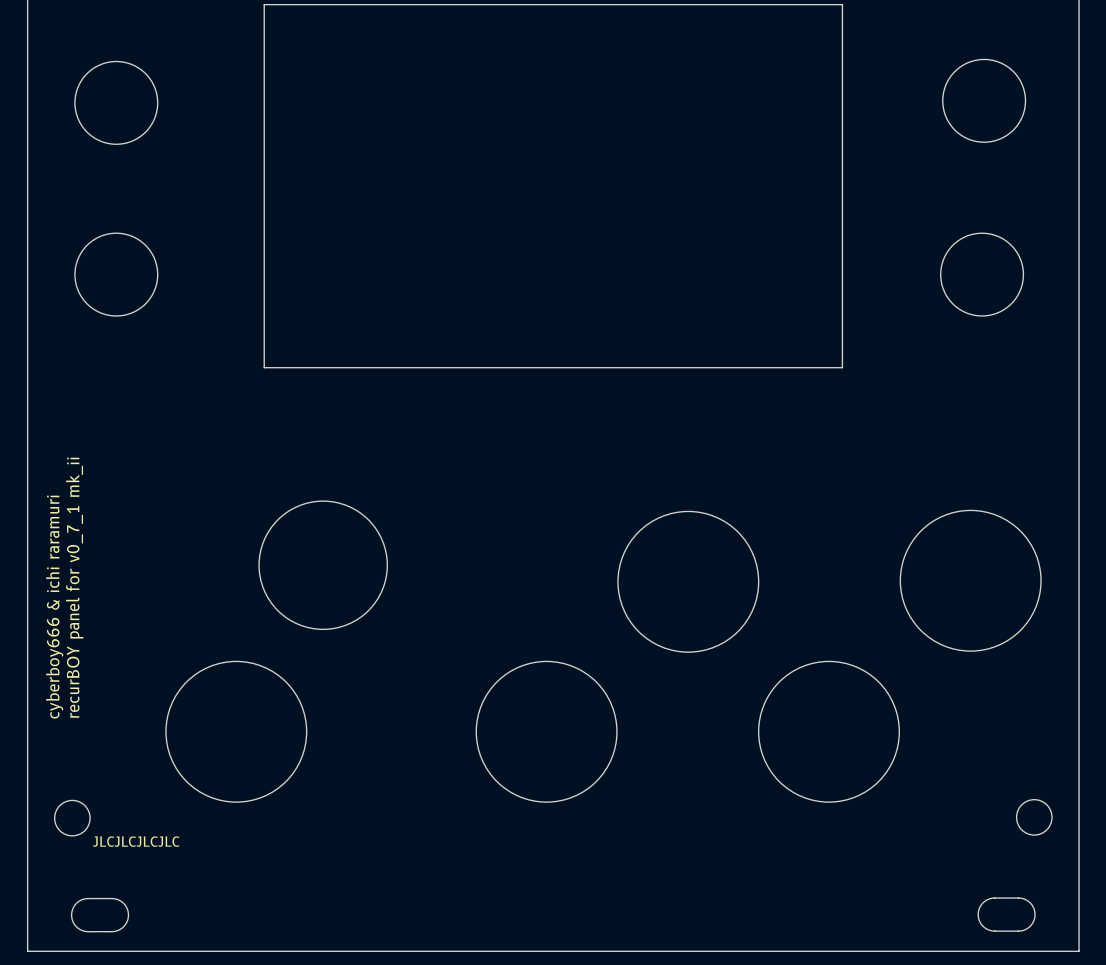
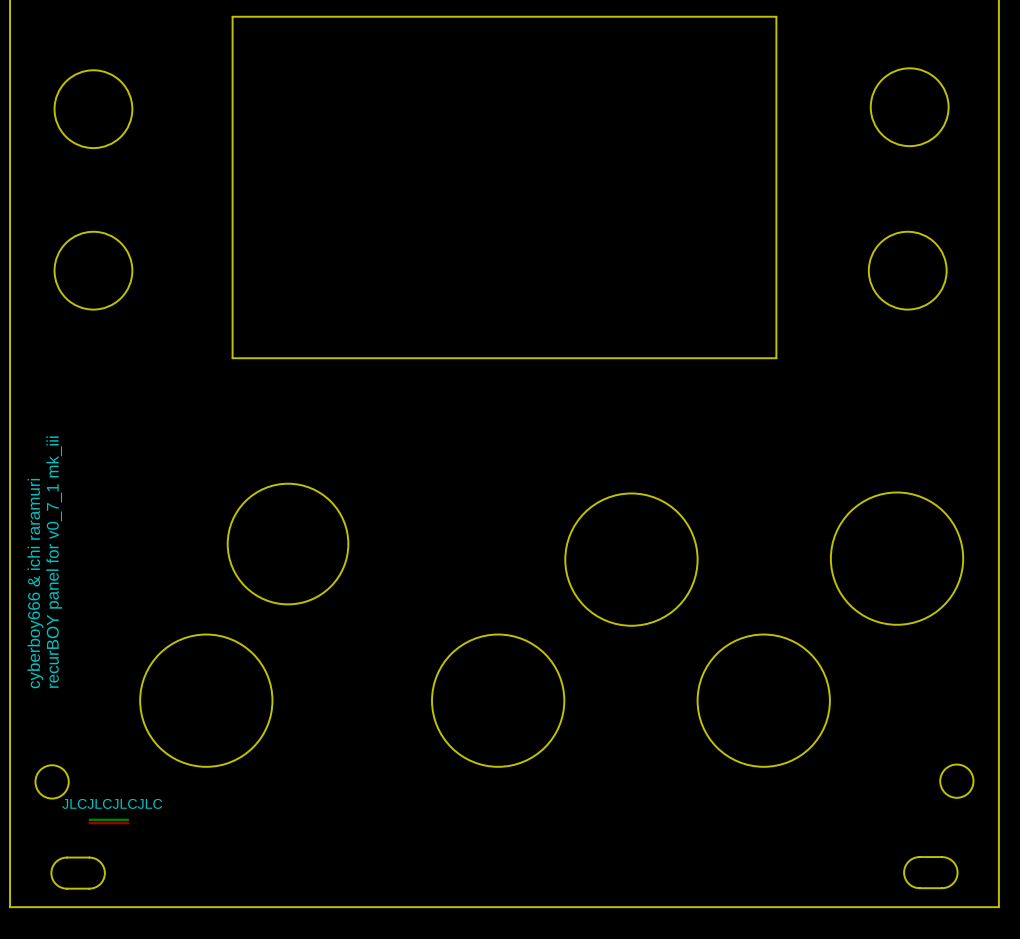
text: recurBOY panel for v0_7_1 mk_ii (74, 587) -> recurBOY panel for v0_7_1 mk_iii (54, 562)
bottom track: none -> (127, 819) (89, 819)
top track: none -> (128, 823) (89, 823)

